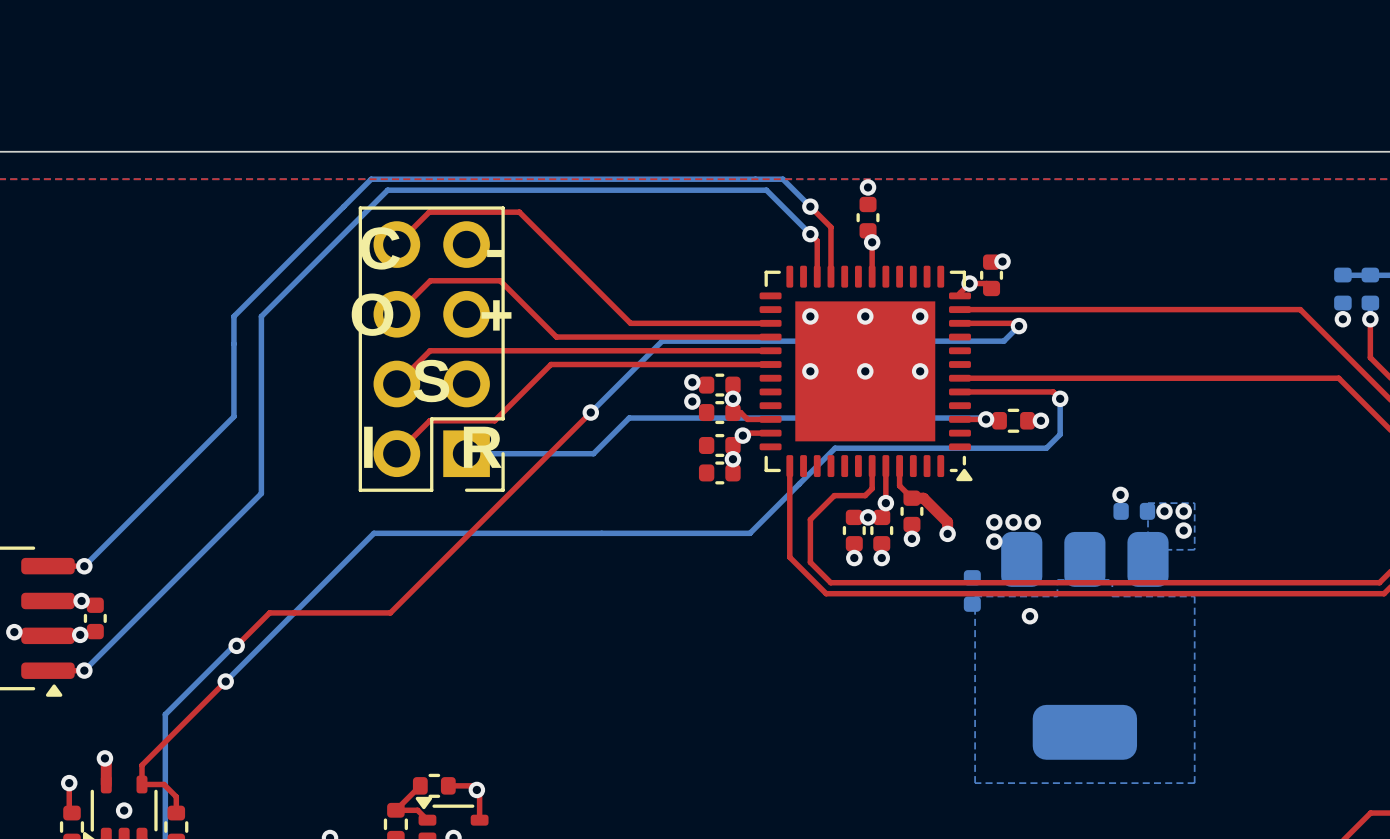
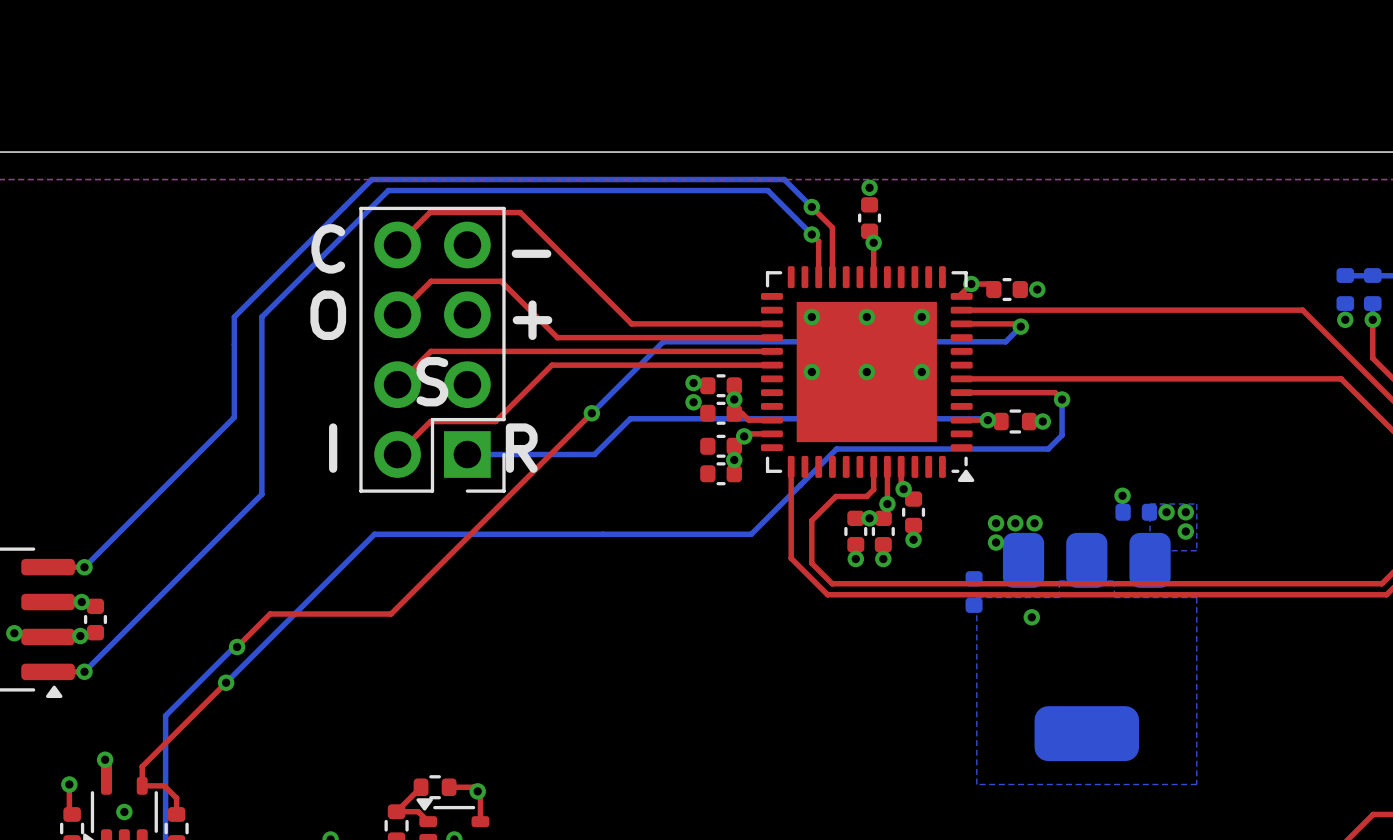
via position: (1002, 261) -> (1037, 289)
part rotation: 0° (991, 275) -> 90° clockwise (1007, 289)
top track: (911, 498) (923, 498) (947, 522) (947, 533) -> none
via position: (947, 533) -> (903, 489)

